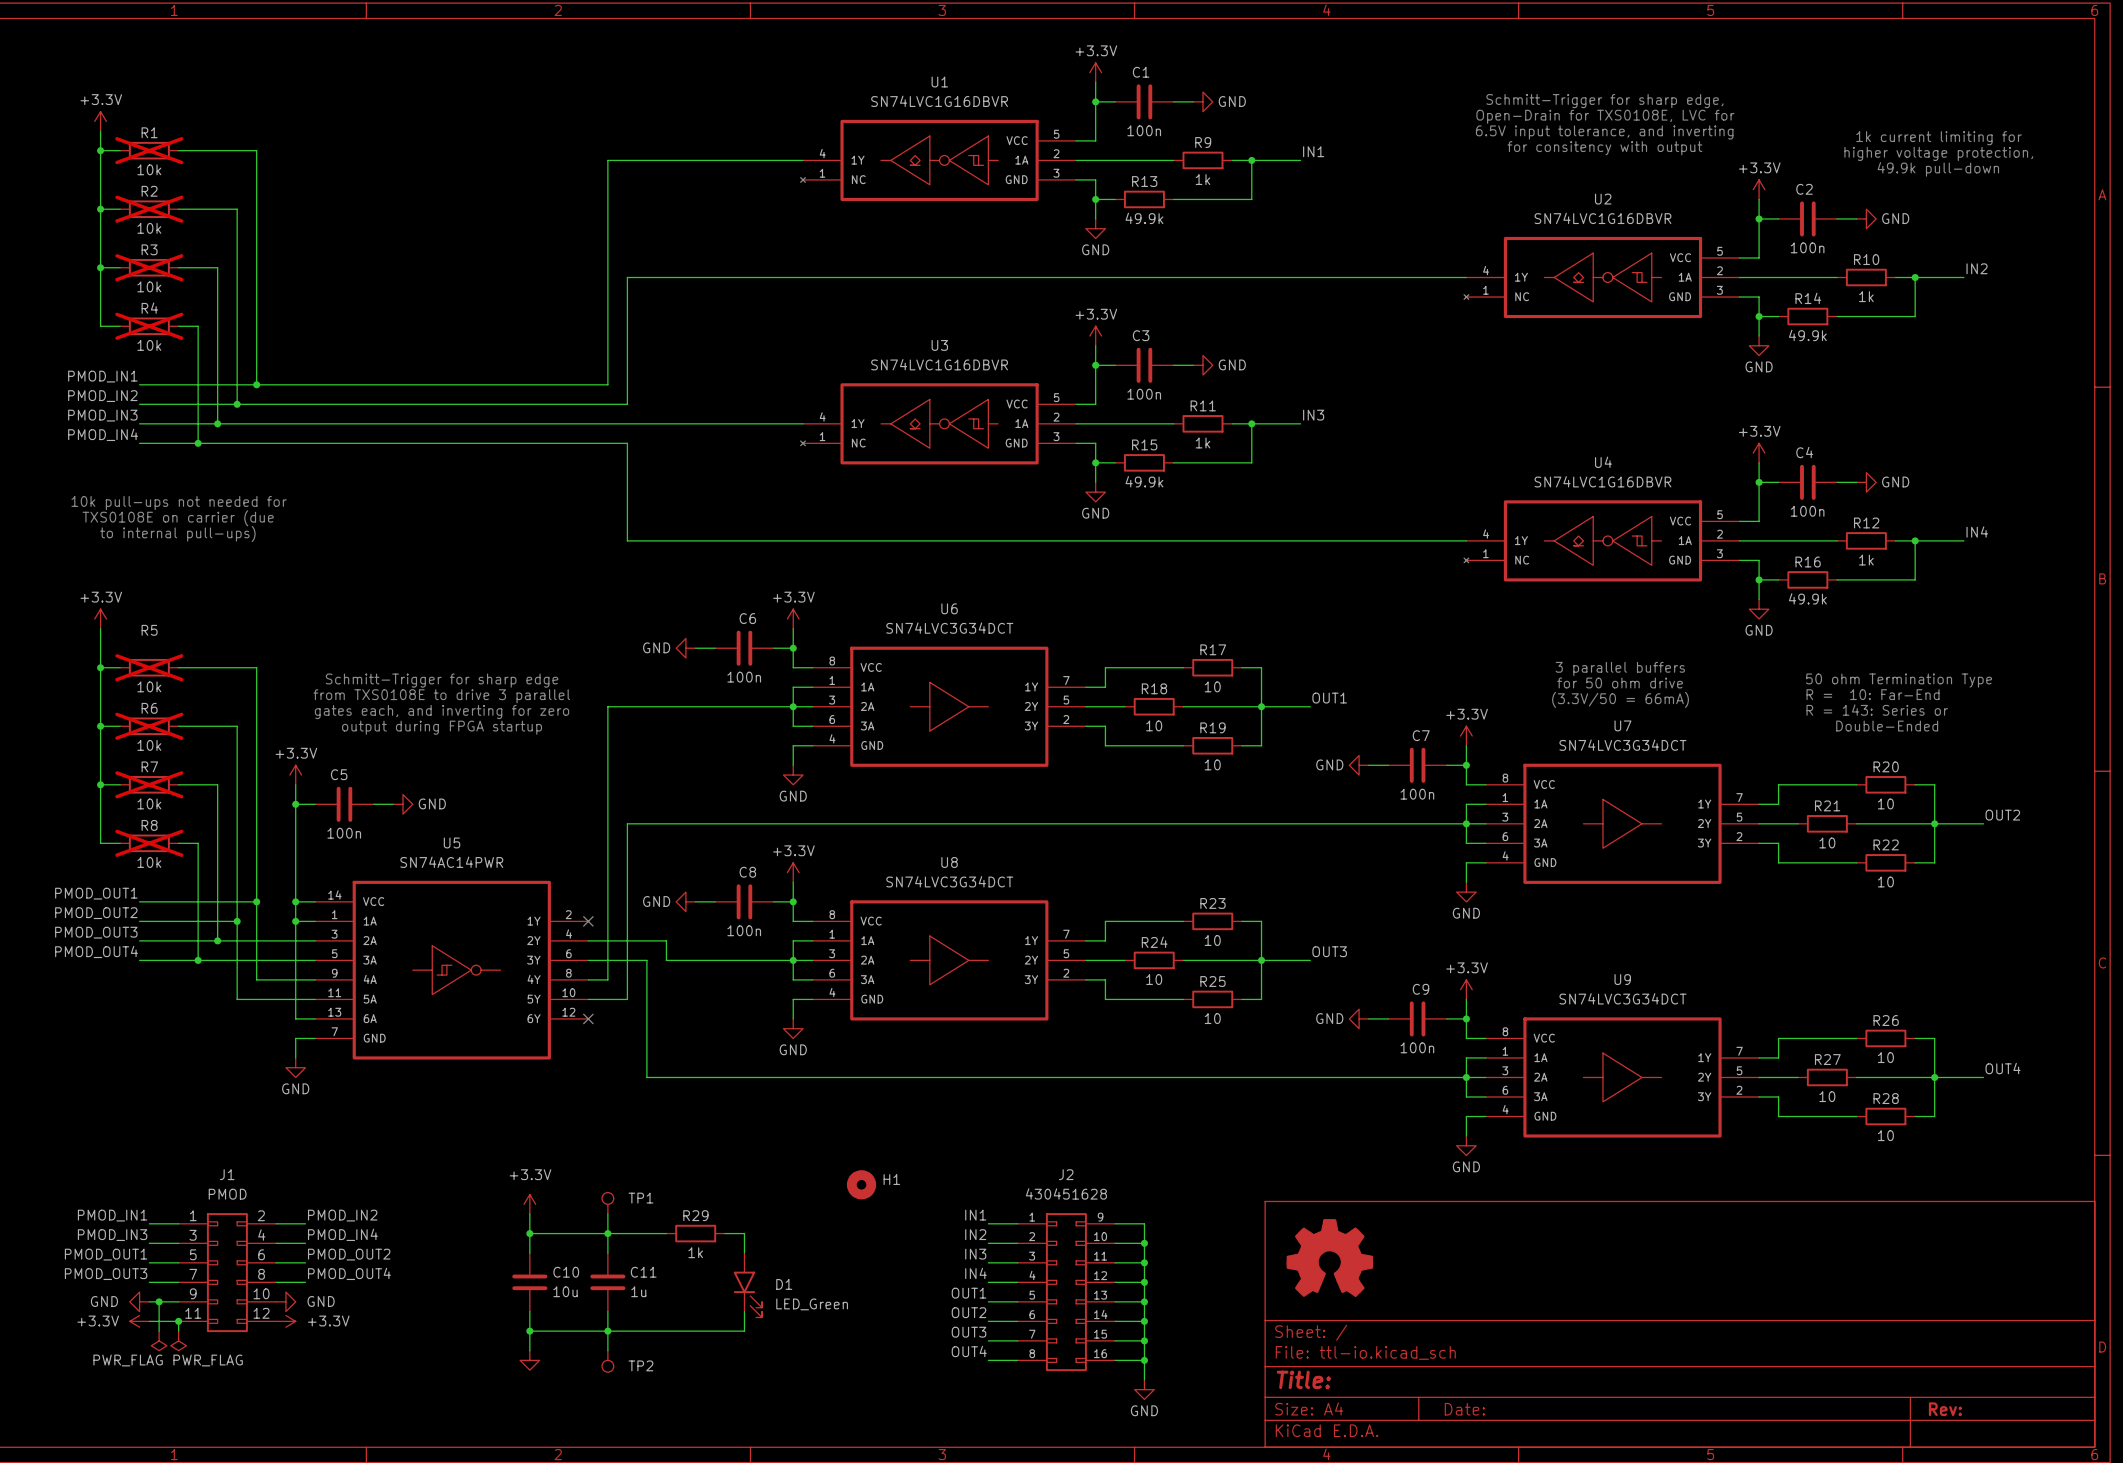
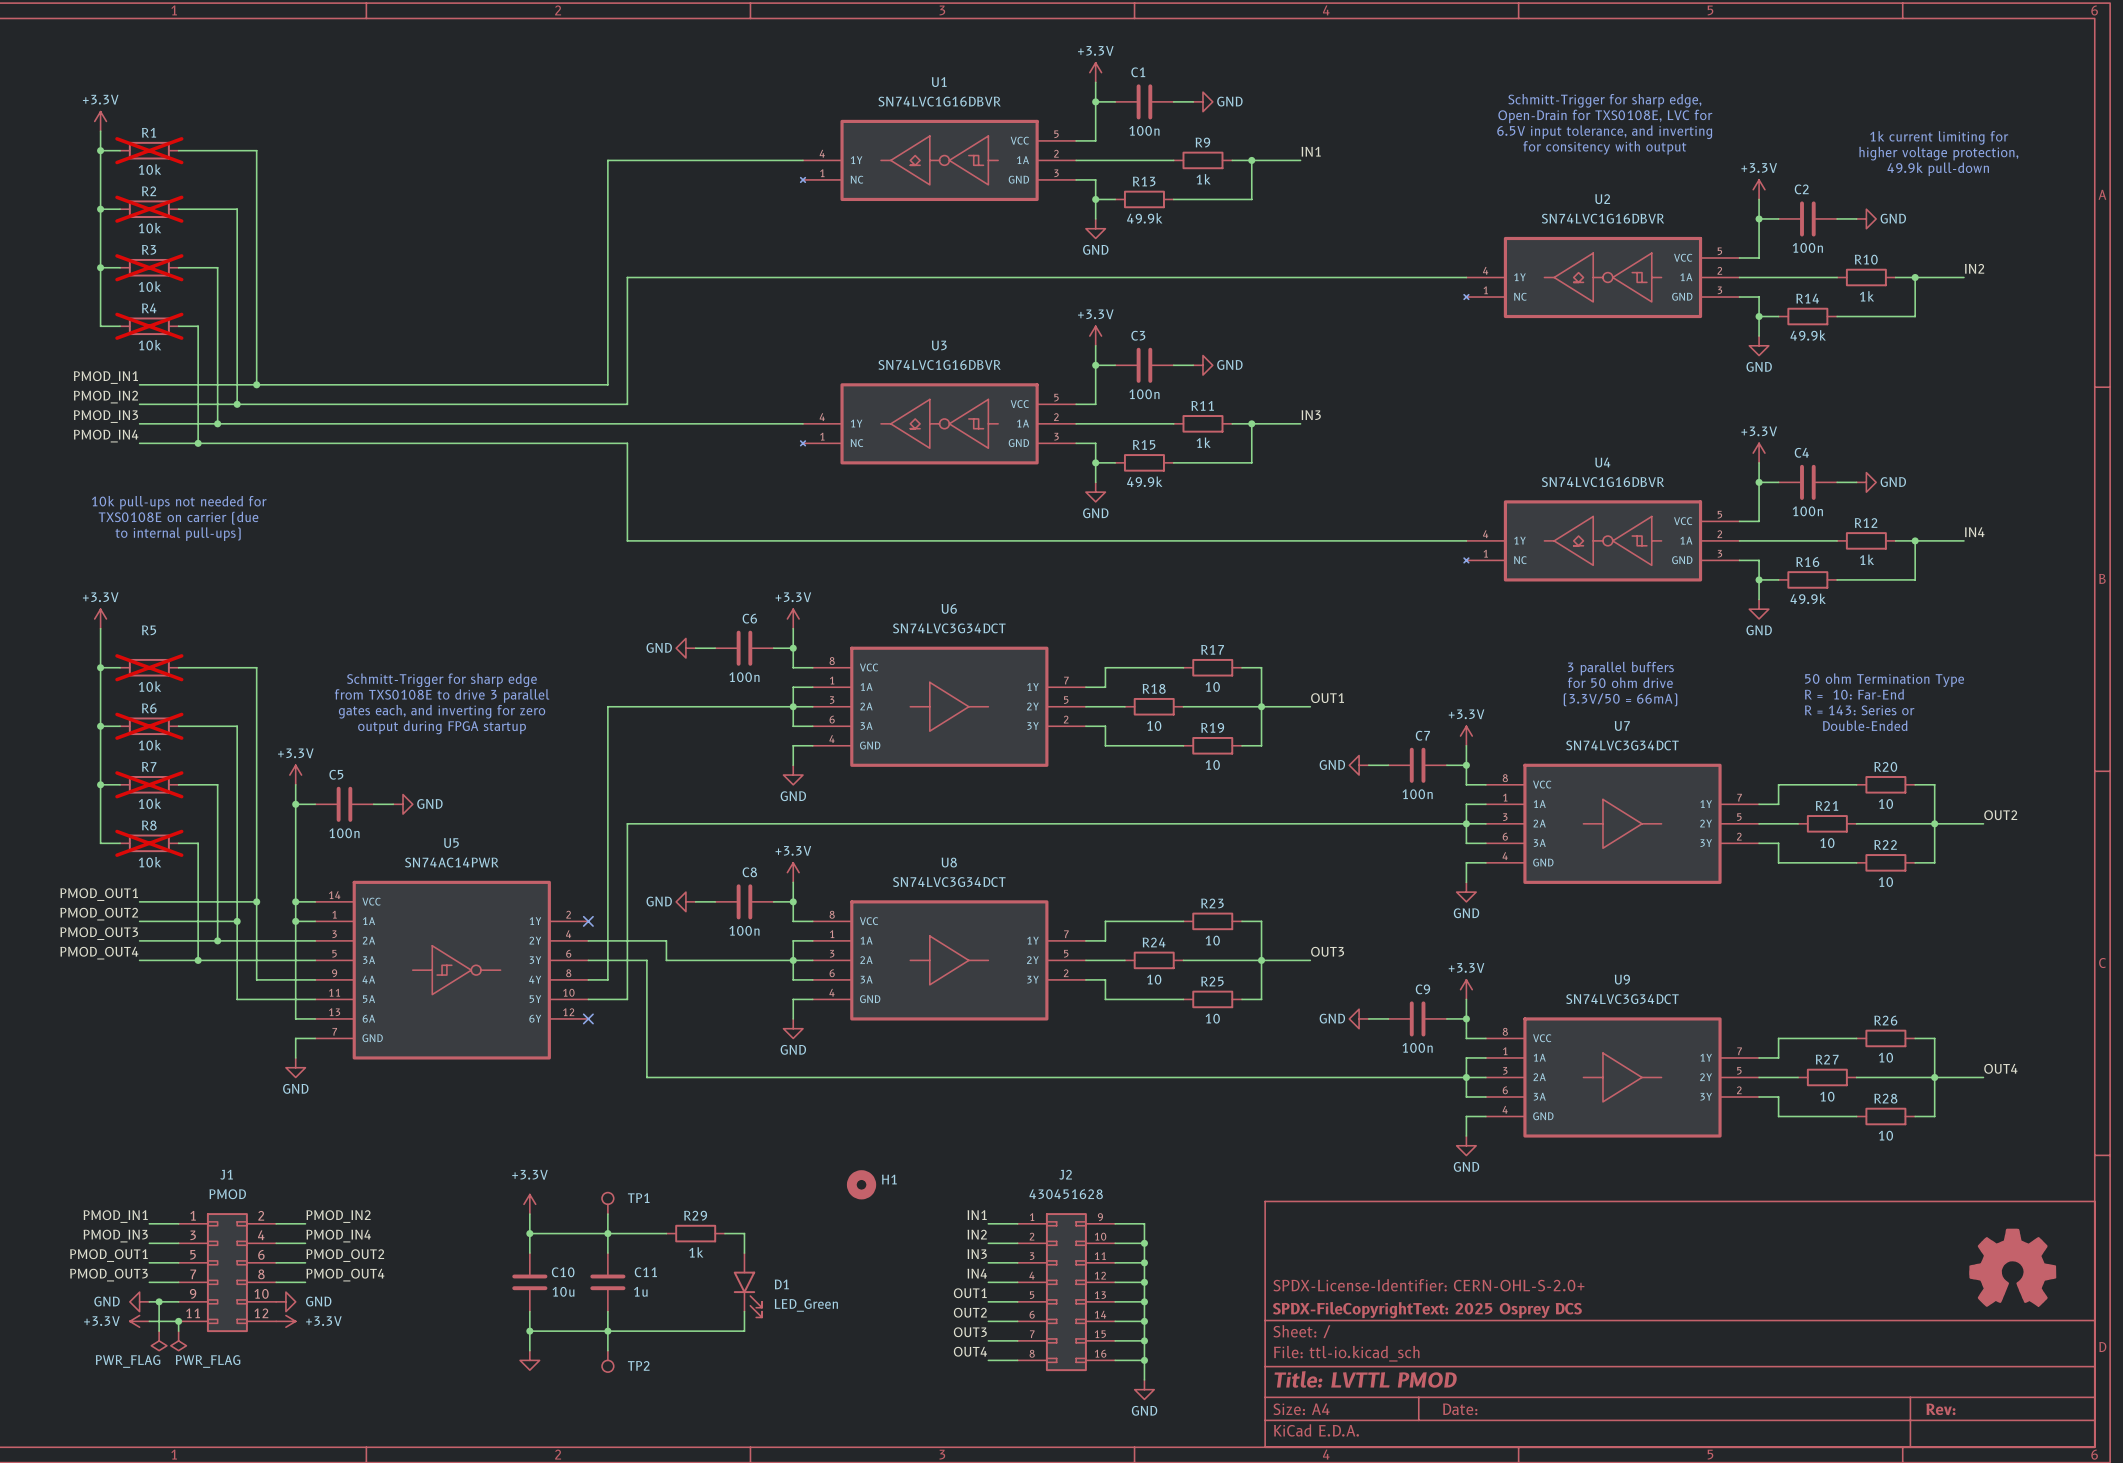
part: (1329, 1257) -> none
part: none -> (2012, 1267)
title block: none -> SPDX-License-Identifier: CERN-OHL-S-2.0+ (1428, 1285)
title block: none -> SPDX-FileCopyrightText: 2025 Osprey DCS (1427, 1310)
title block: Title: (1303, 1379) -> Title: LVTTL PMOD (1365, 1379)

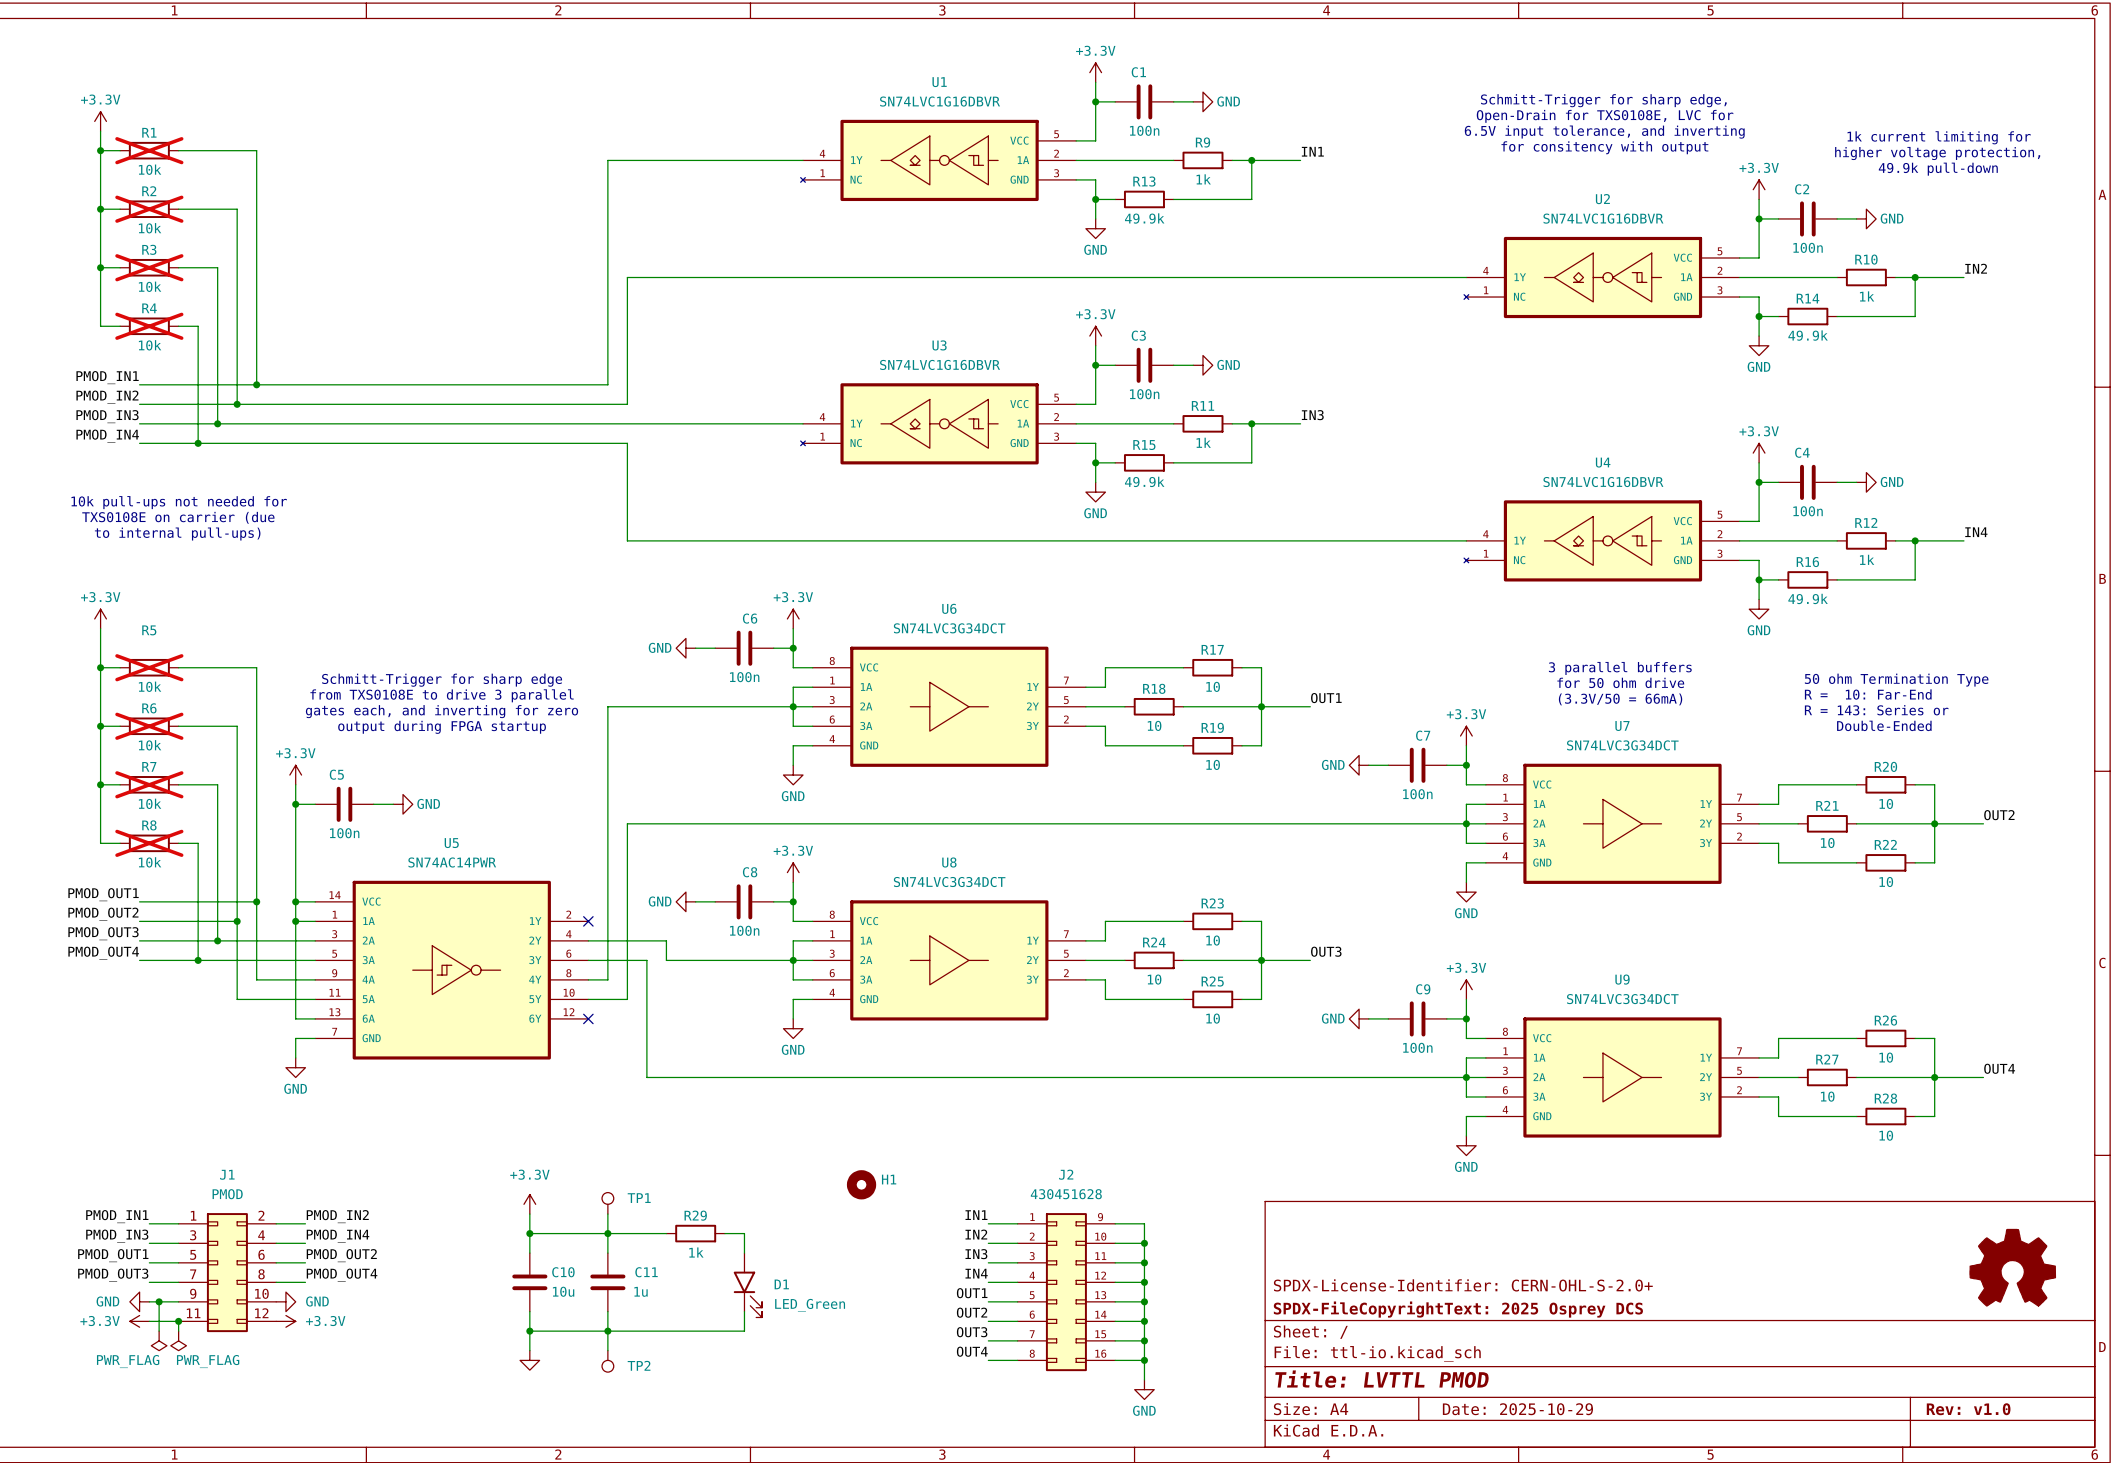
title block: Date: (1460, 1409) -> Date: 2025-10-29 (1517, 1409)
title block: Rev: (1940, 1409) -> Rev: v1.0 (1968, 1409)

